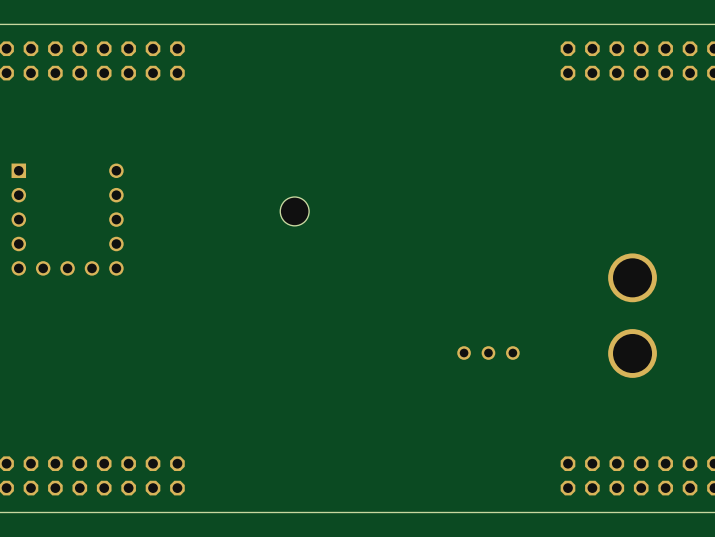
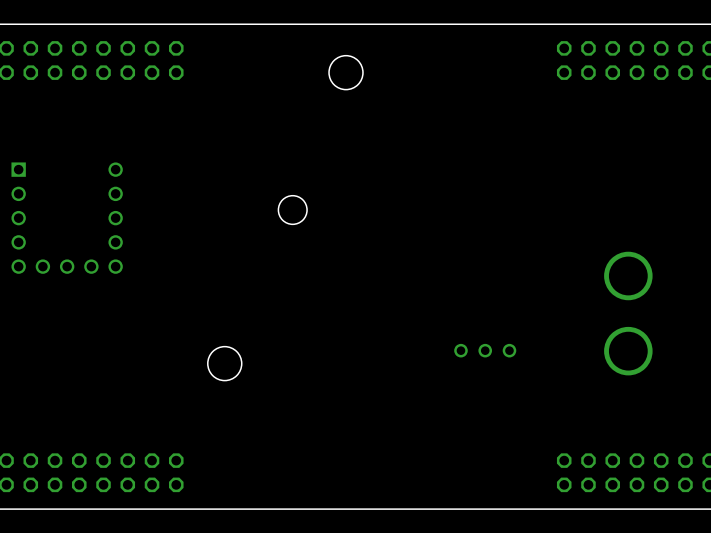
drawing: none -> [328, 55, 364, 90]
drawing: none -> [207, 346, 242, 381]

